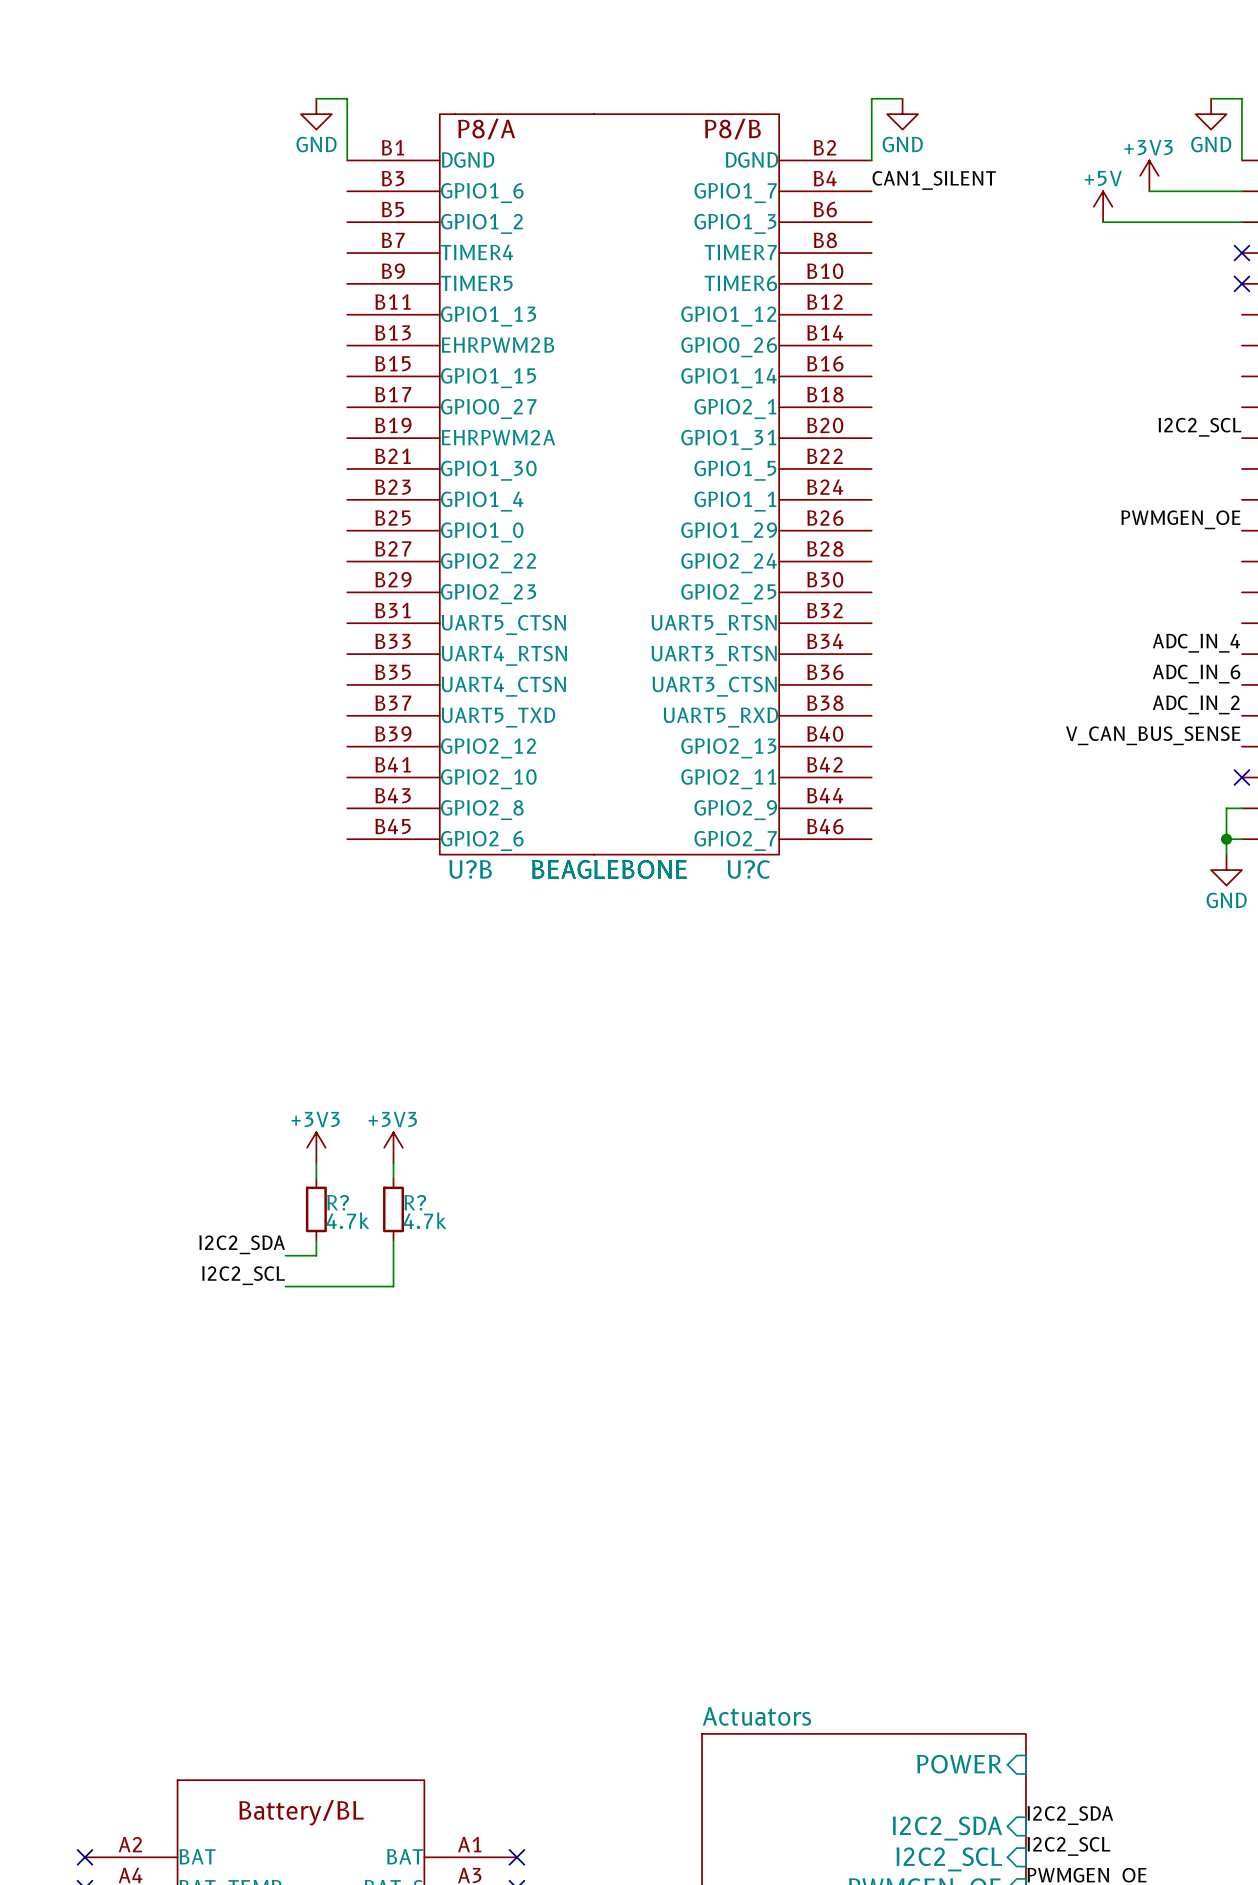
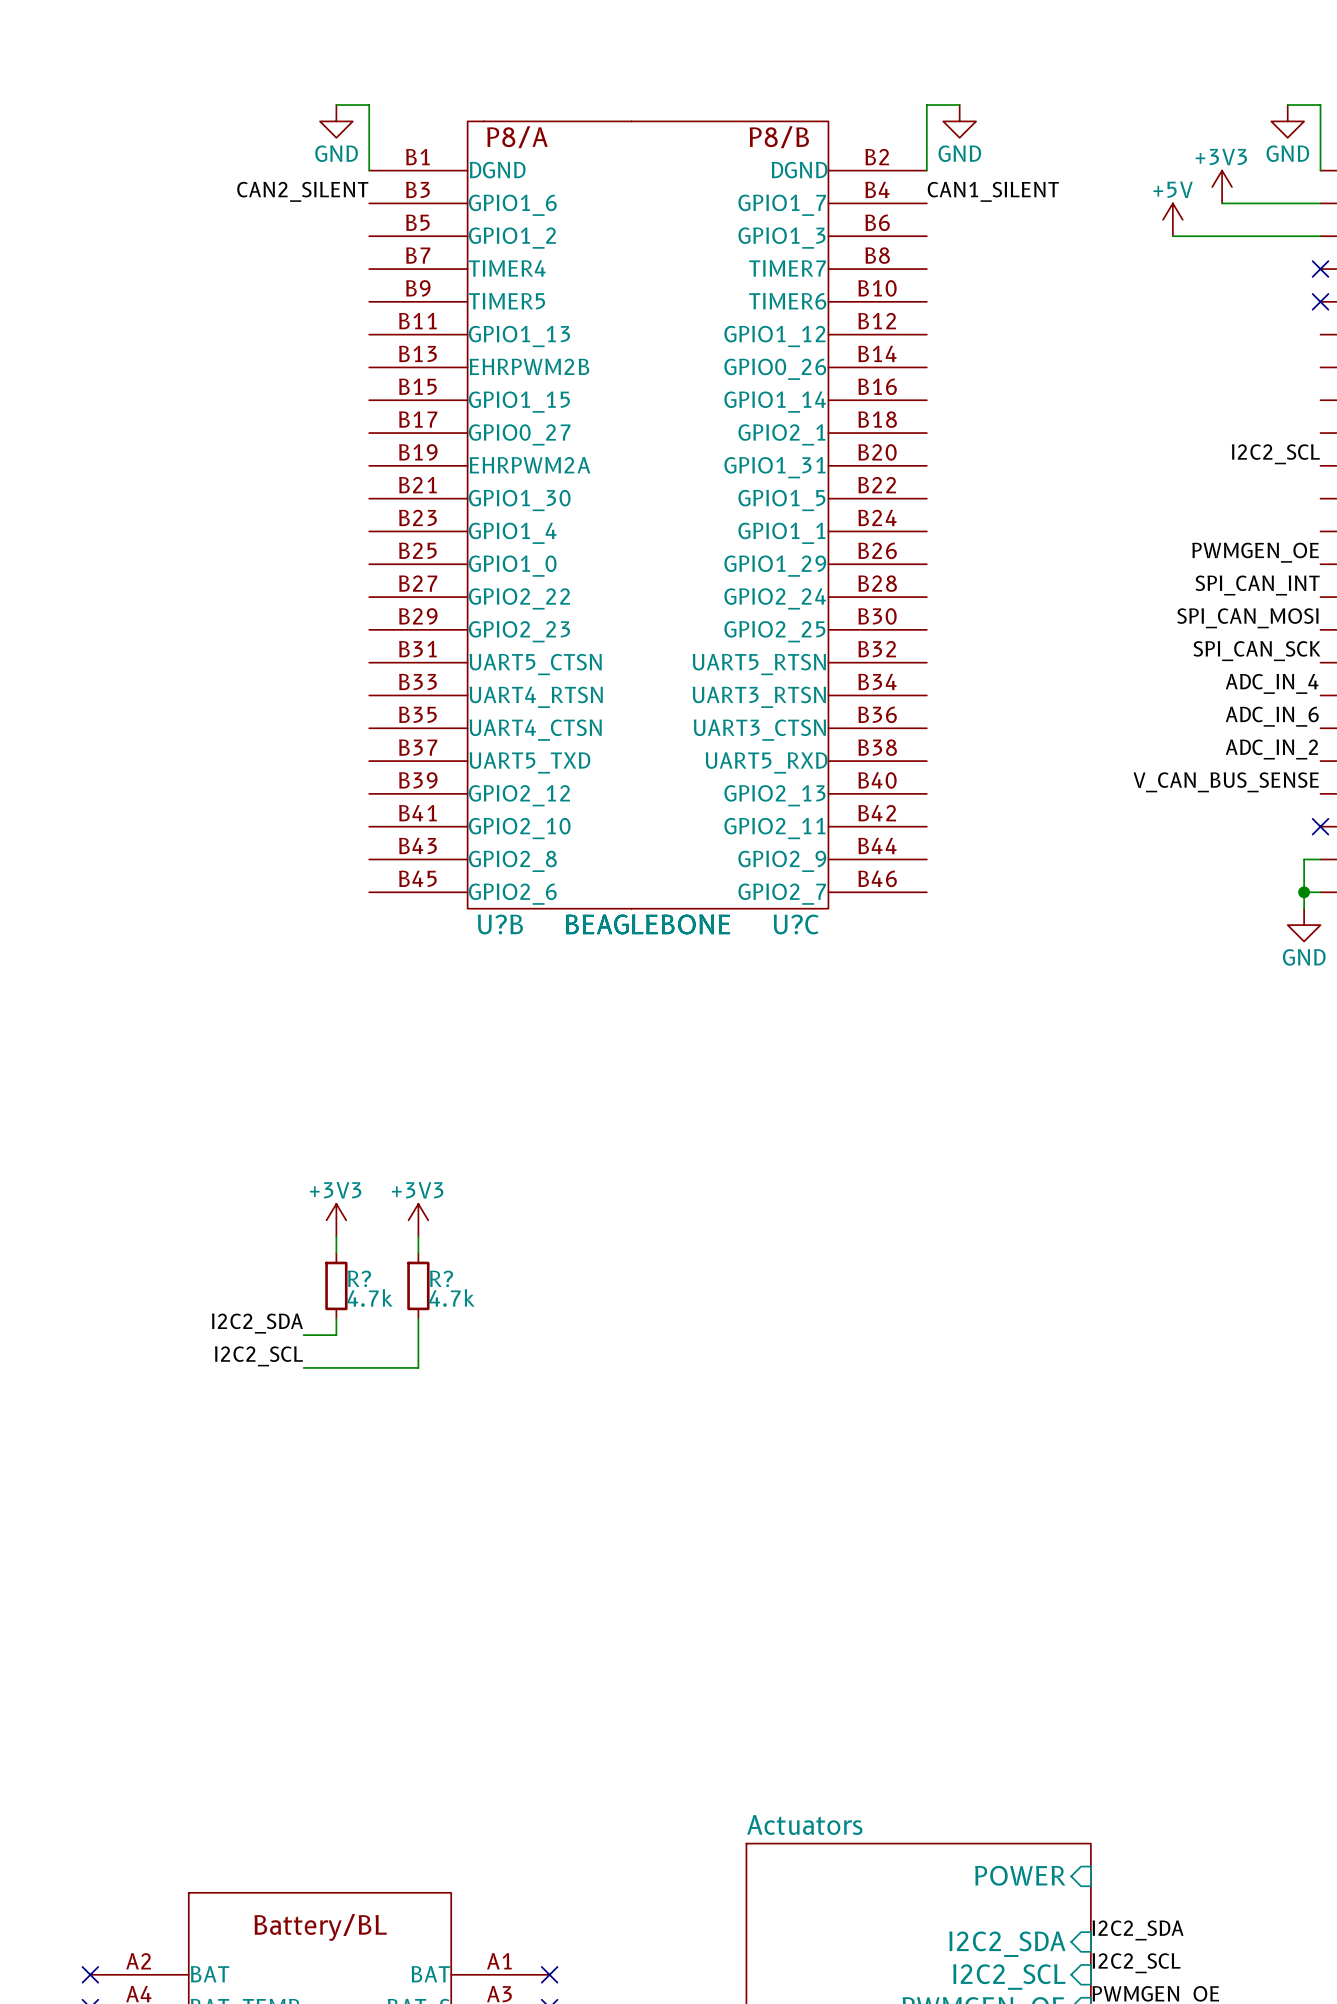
label: none -> CAN2_SILENT (302, 191)
label: none -> SPI_CAN_INT (1257, 585)
label: none -> SPI_CAN_MOSI (1247, 618)
label: none -> SPI_CAN_SCK (1256, 651)

